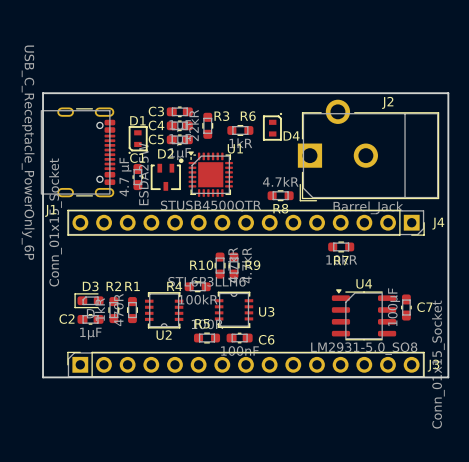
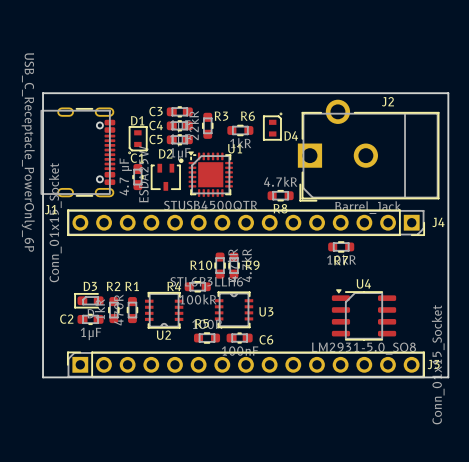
C7: 100μF (406, 307) -> none

